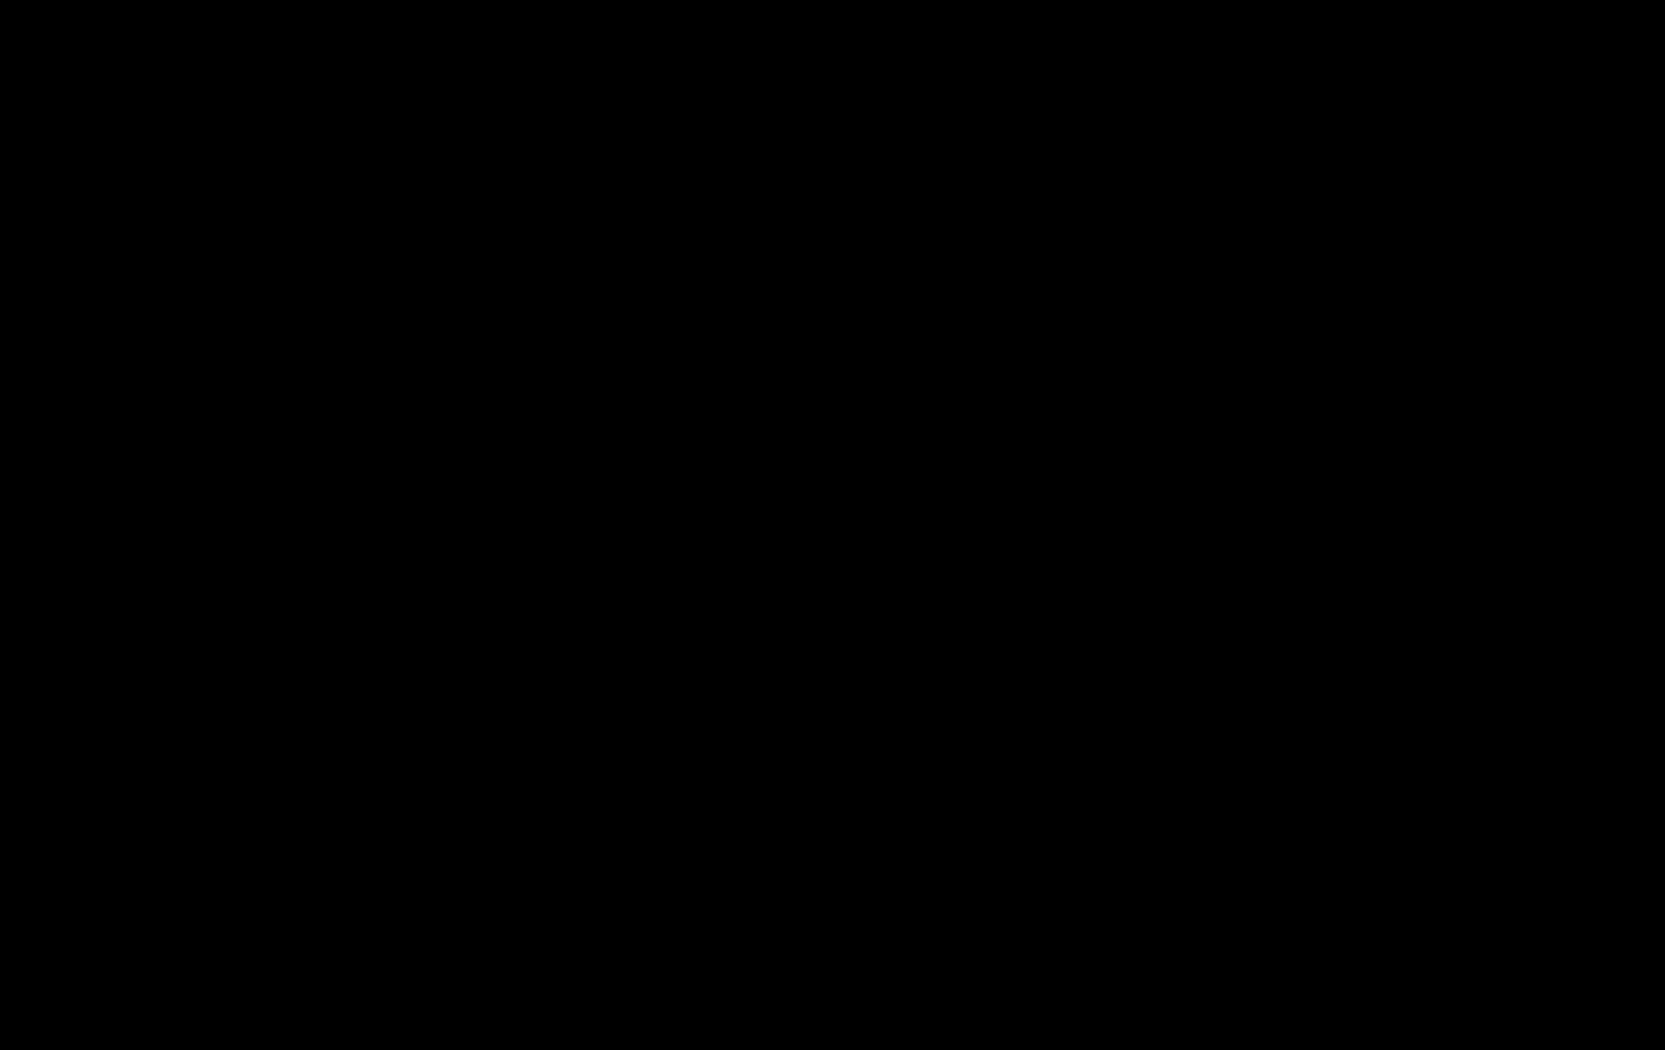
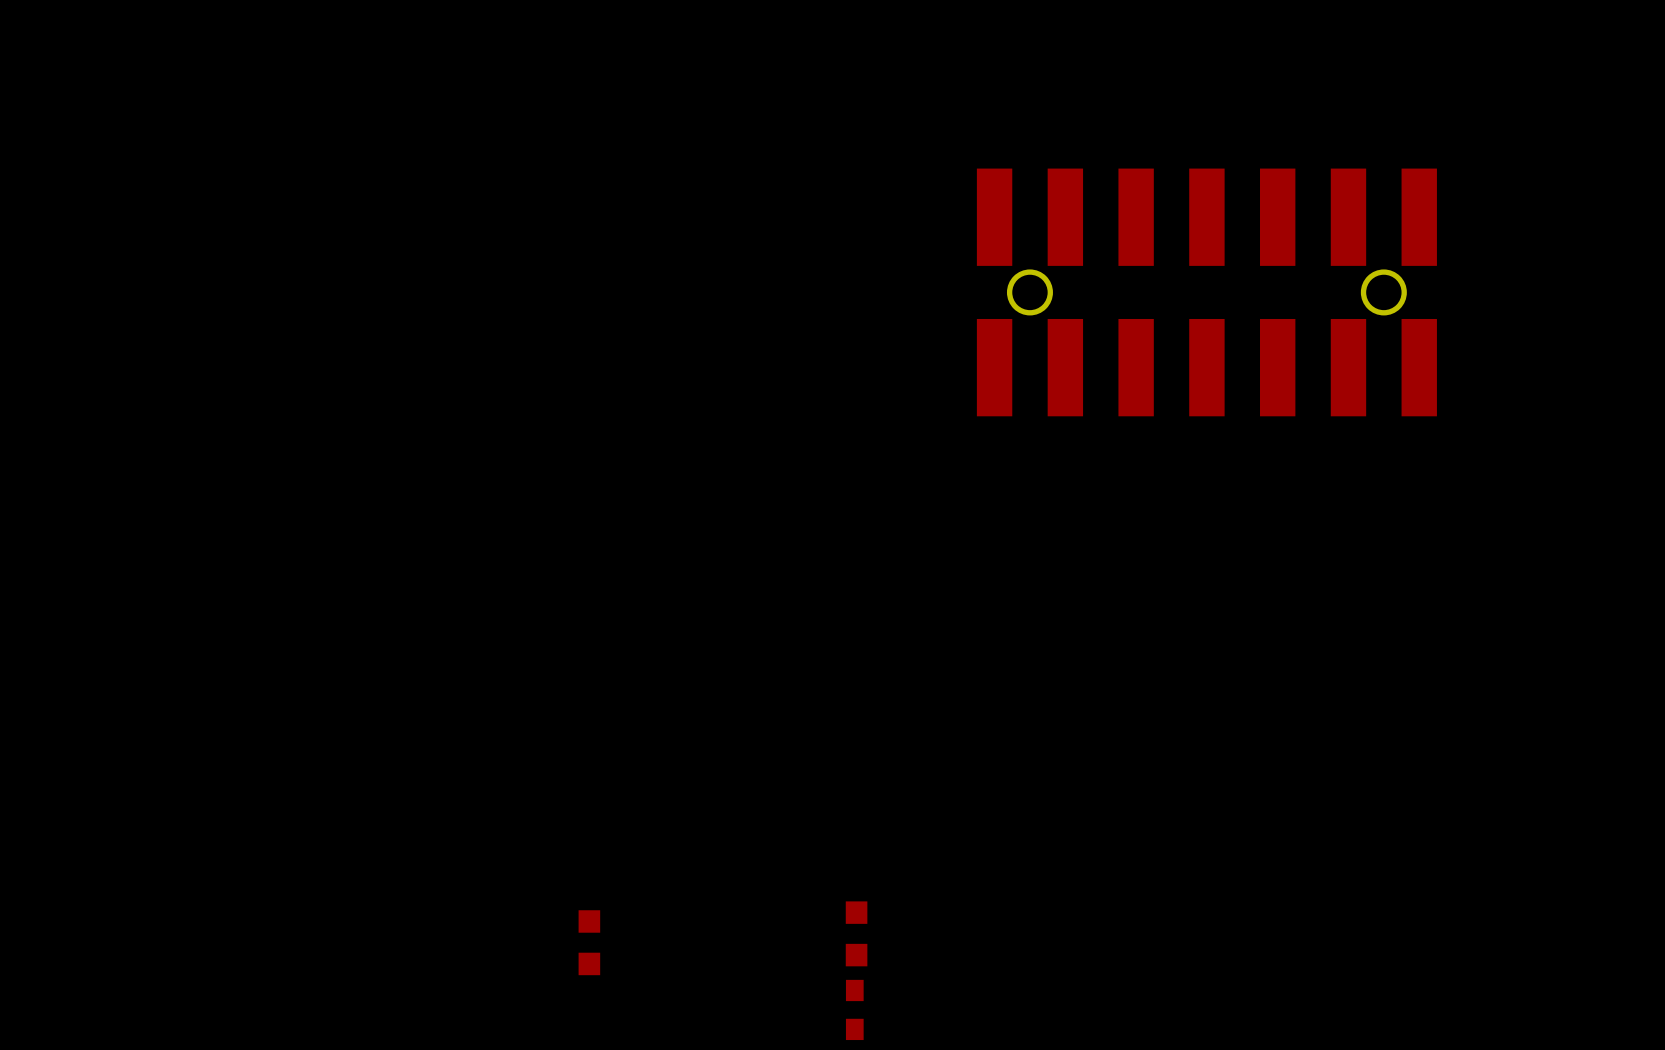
part: none -> (1206, 292)
part: none -> (856, 933)
part: none -> (589, 942)
part: none -> (854, 1009)

